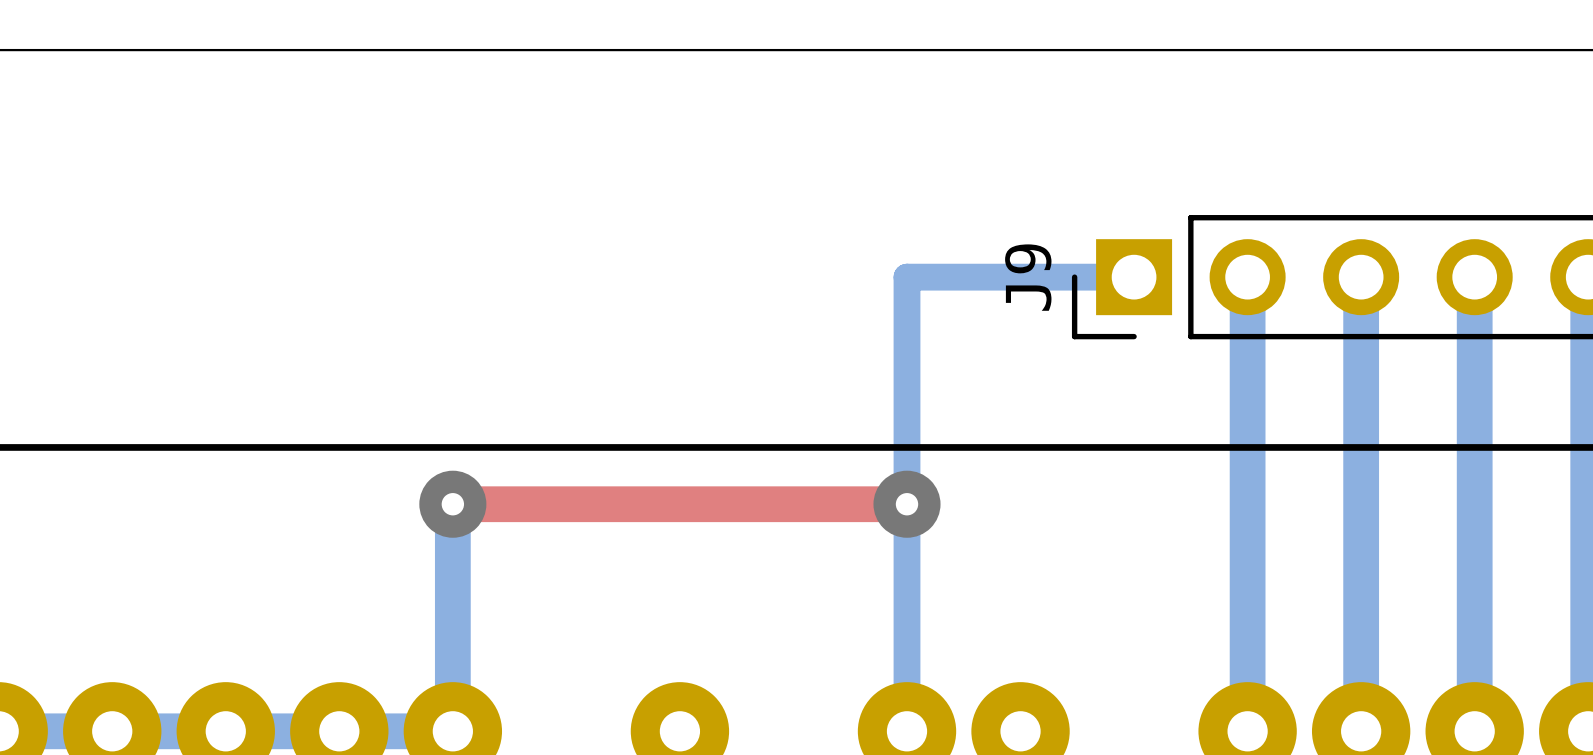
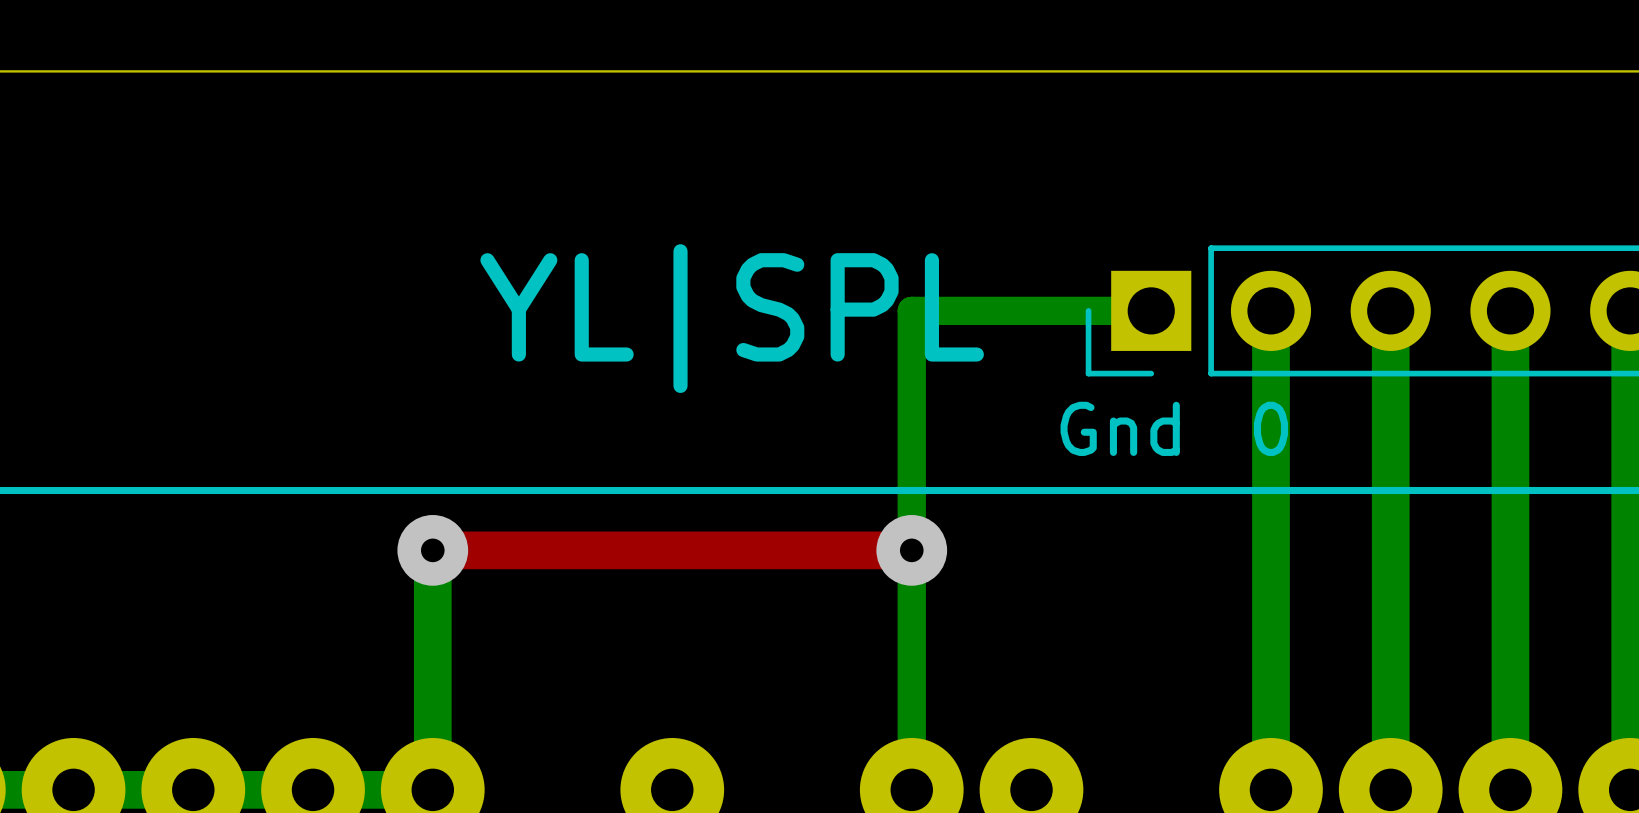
J9 name: J9 (1028, 277) -> none
text: none -> YL|SPL (732, 318)
text: none -> Gnd (1120, 428)
text: none -> 0 (1270, 428)

